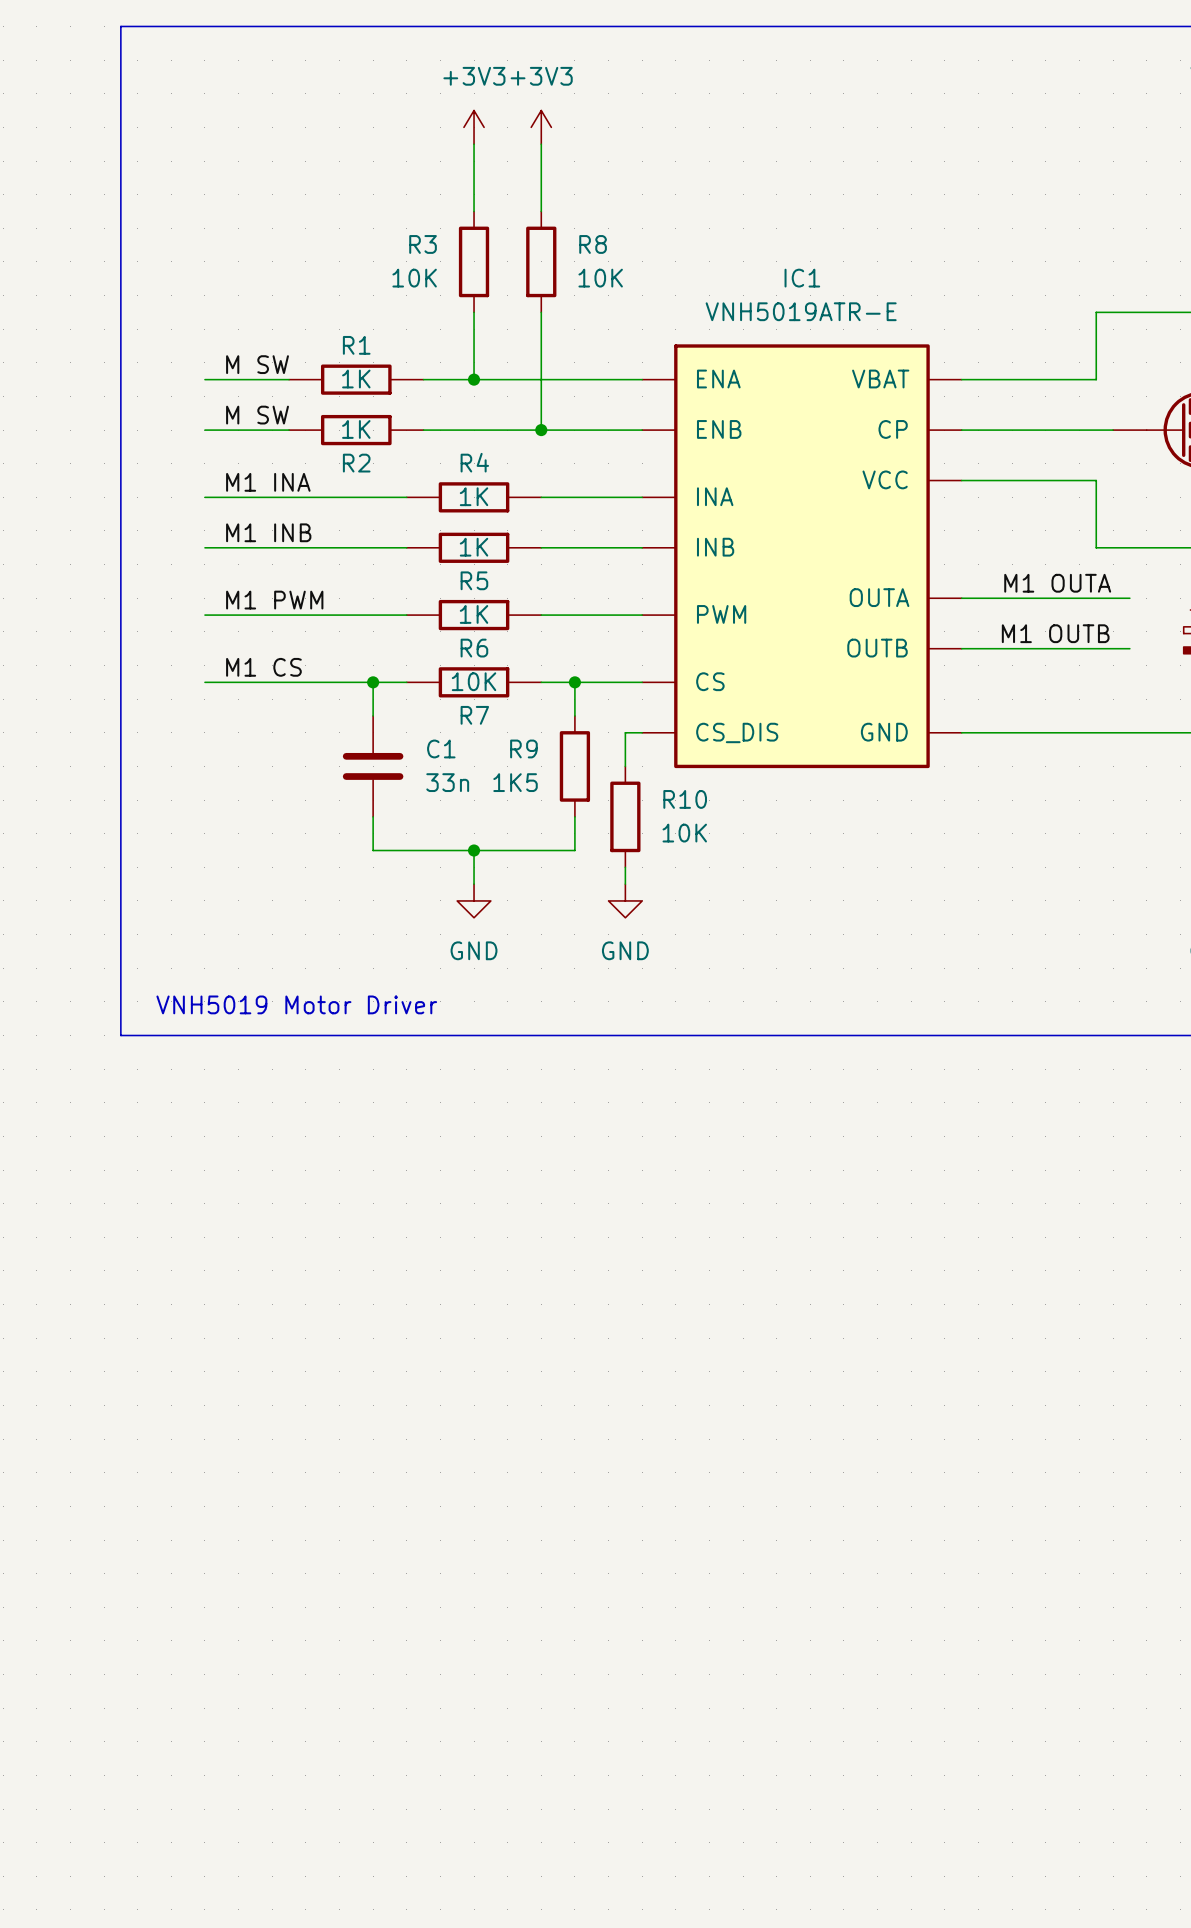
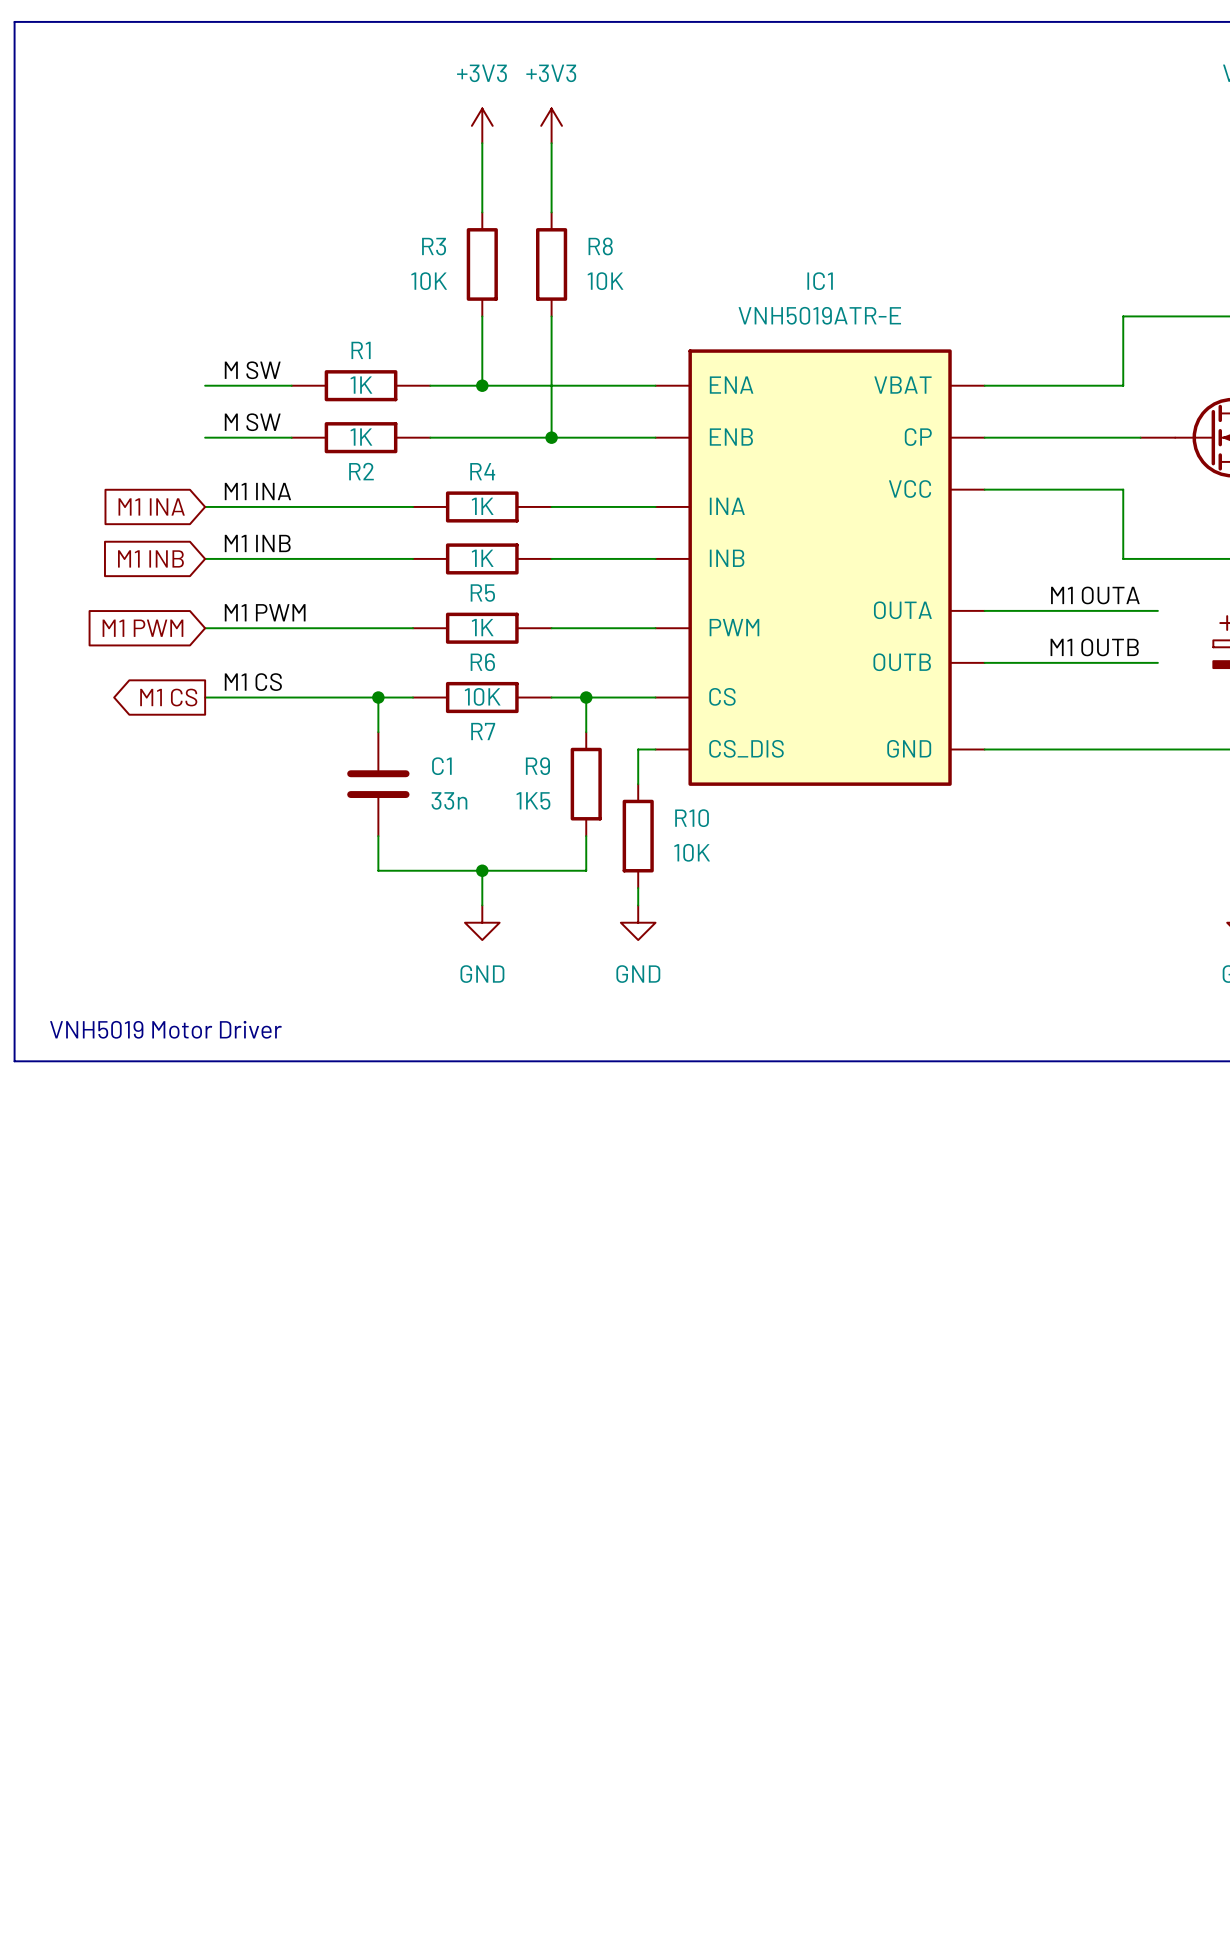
line: (120, 26) (120, 1035) -> (118, 21) (14, 21) (14, 1061) (118, 1061)
global label: none -> M1 INA (151, 506)
global label: none -> M1 INB (150, 558)
global label: none -> M1 PWM (142, 628)
global label: none -> M1 CS (168, 697)
text position: VNH5019 Motor Driver (296, 1004) -> VNH5019 Motor Driver (165, 1029)

